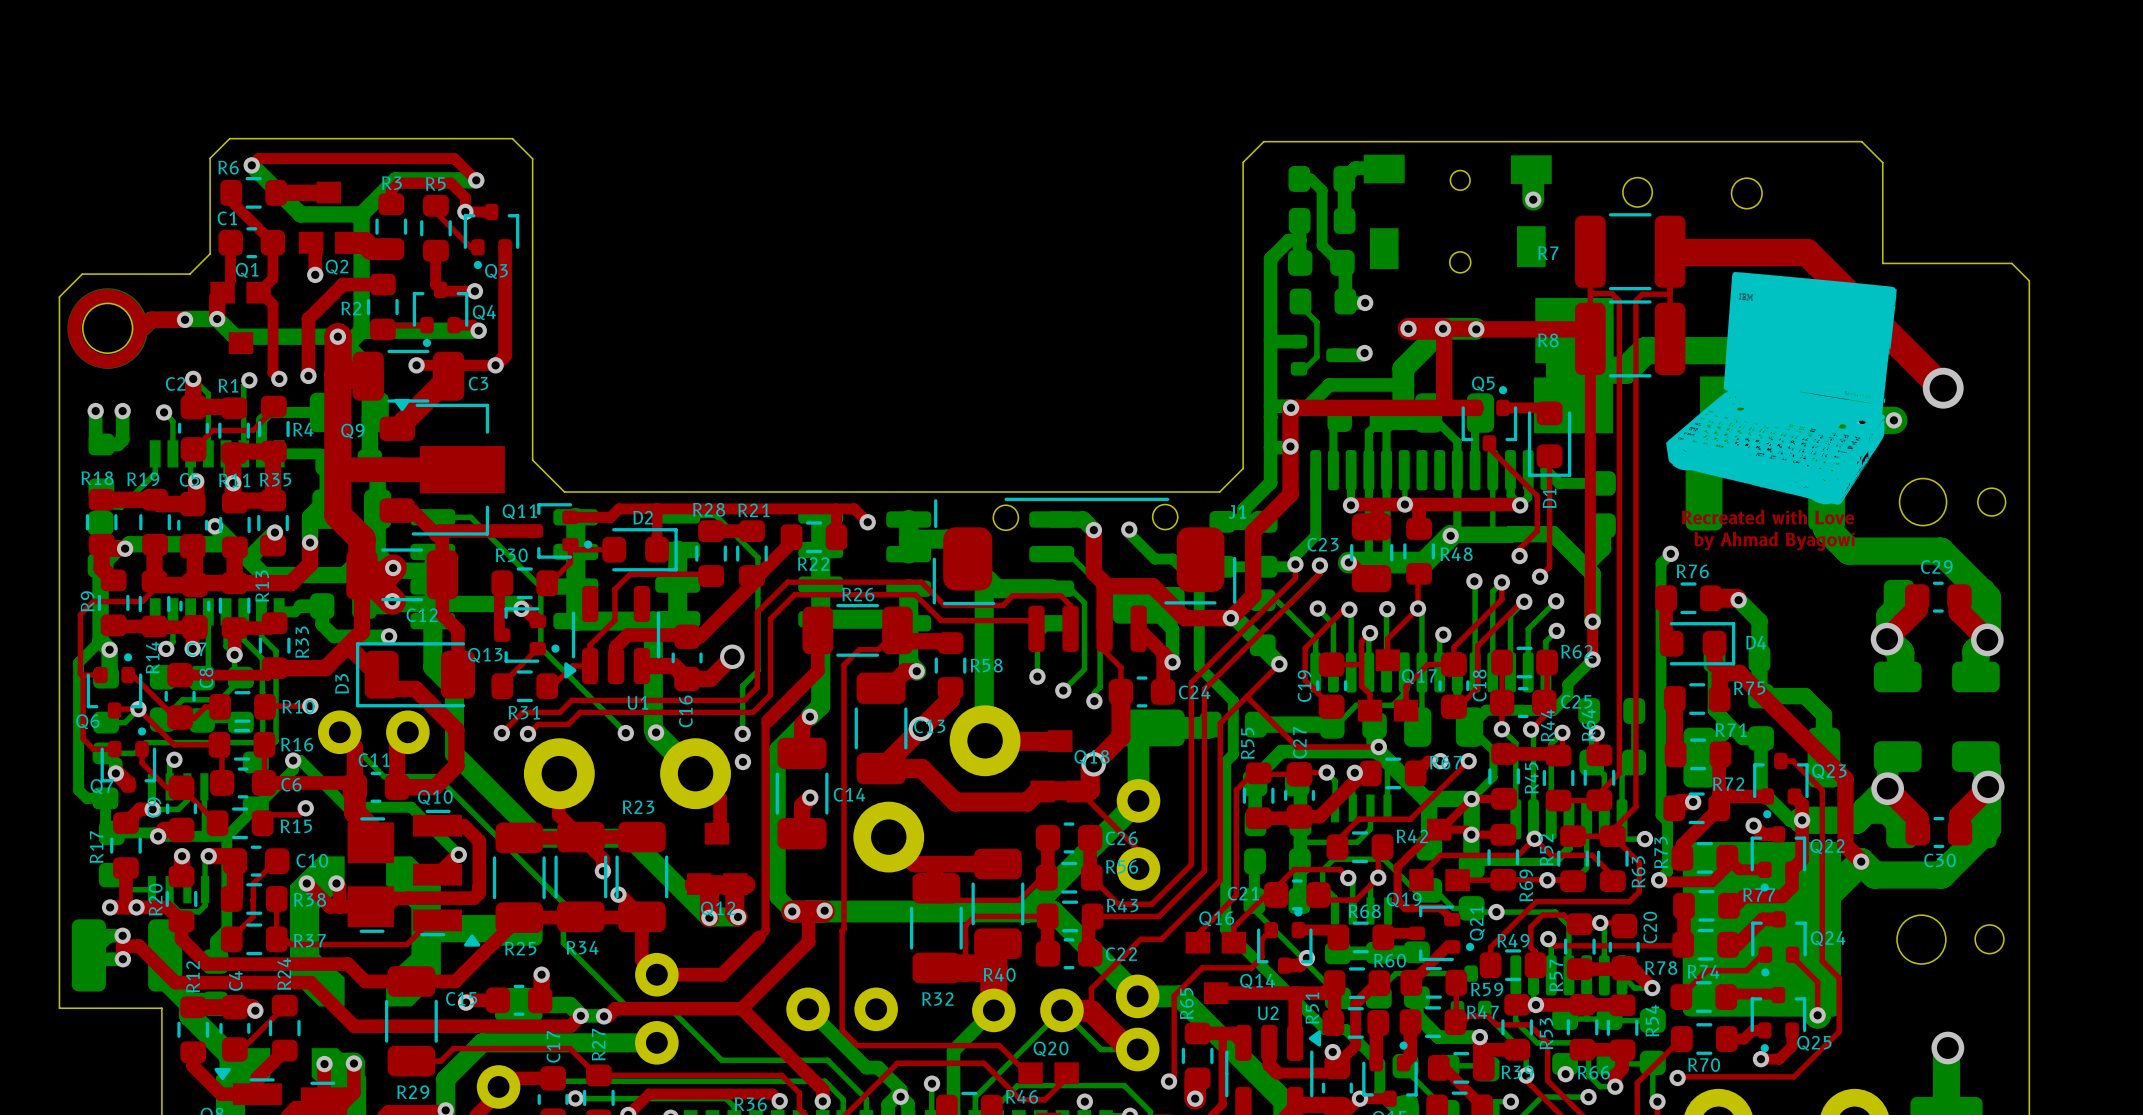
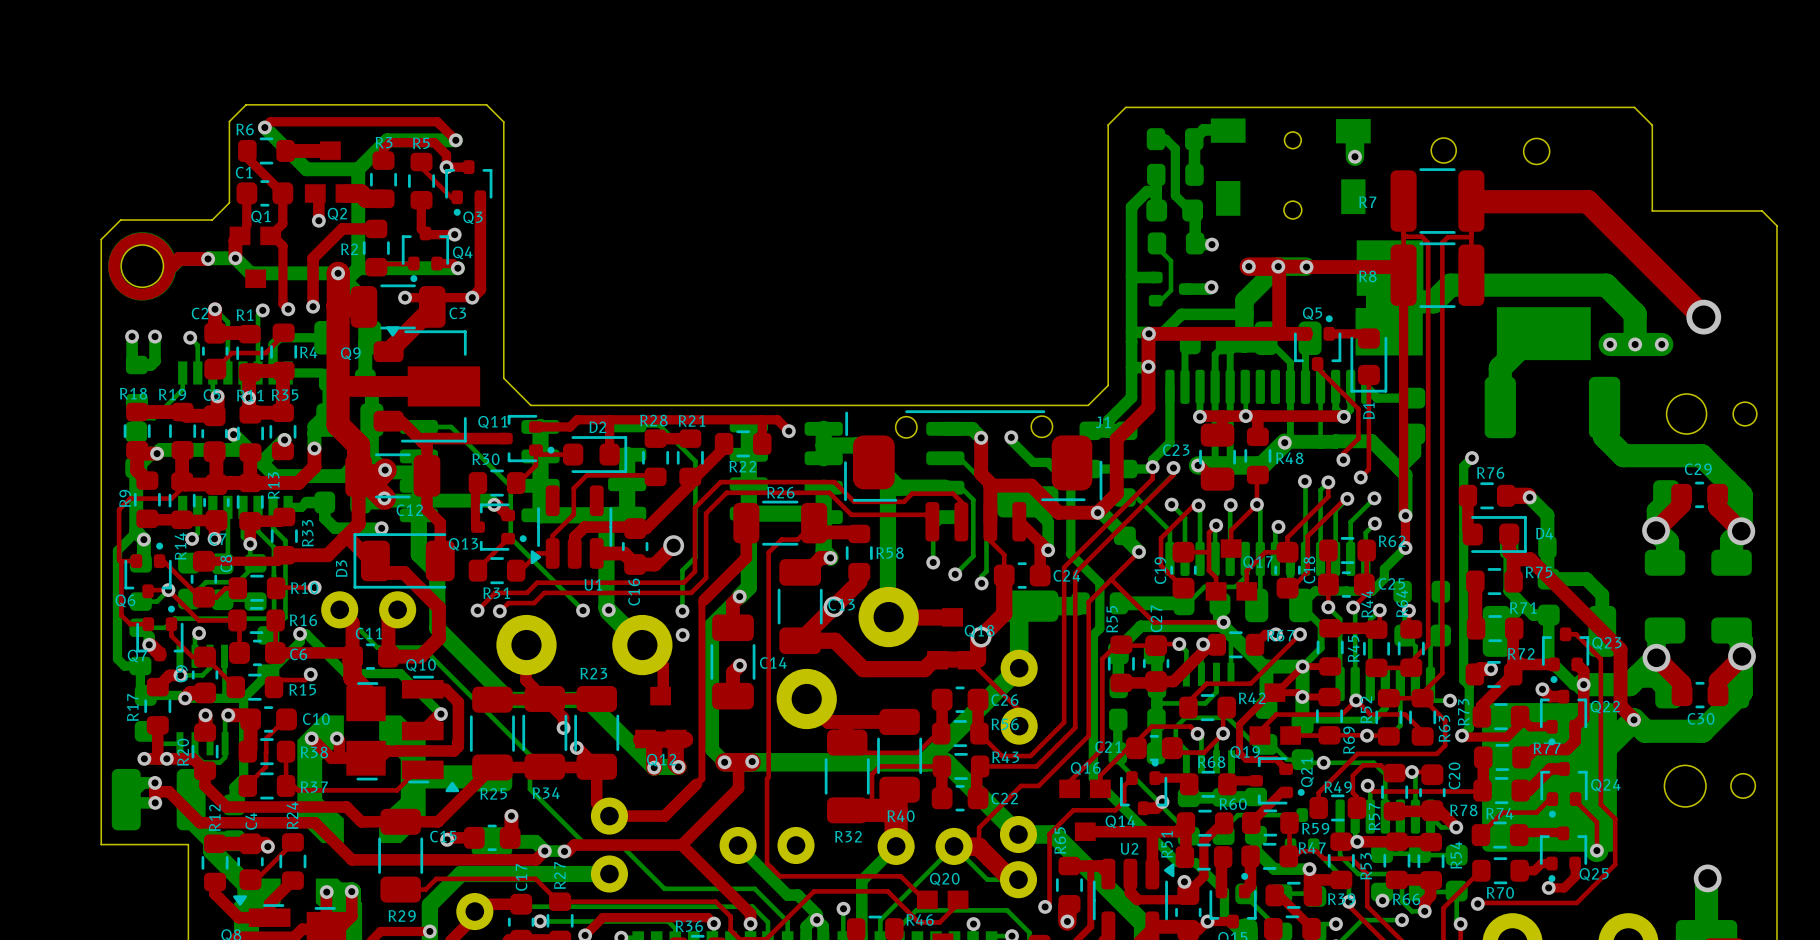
part: (1781, 388) -> none
text: Recreated with Love (1767, 517) -> none
text: by Ahmad Byagowi (1774, 541) -> none

